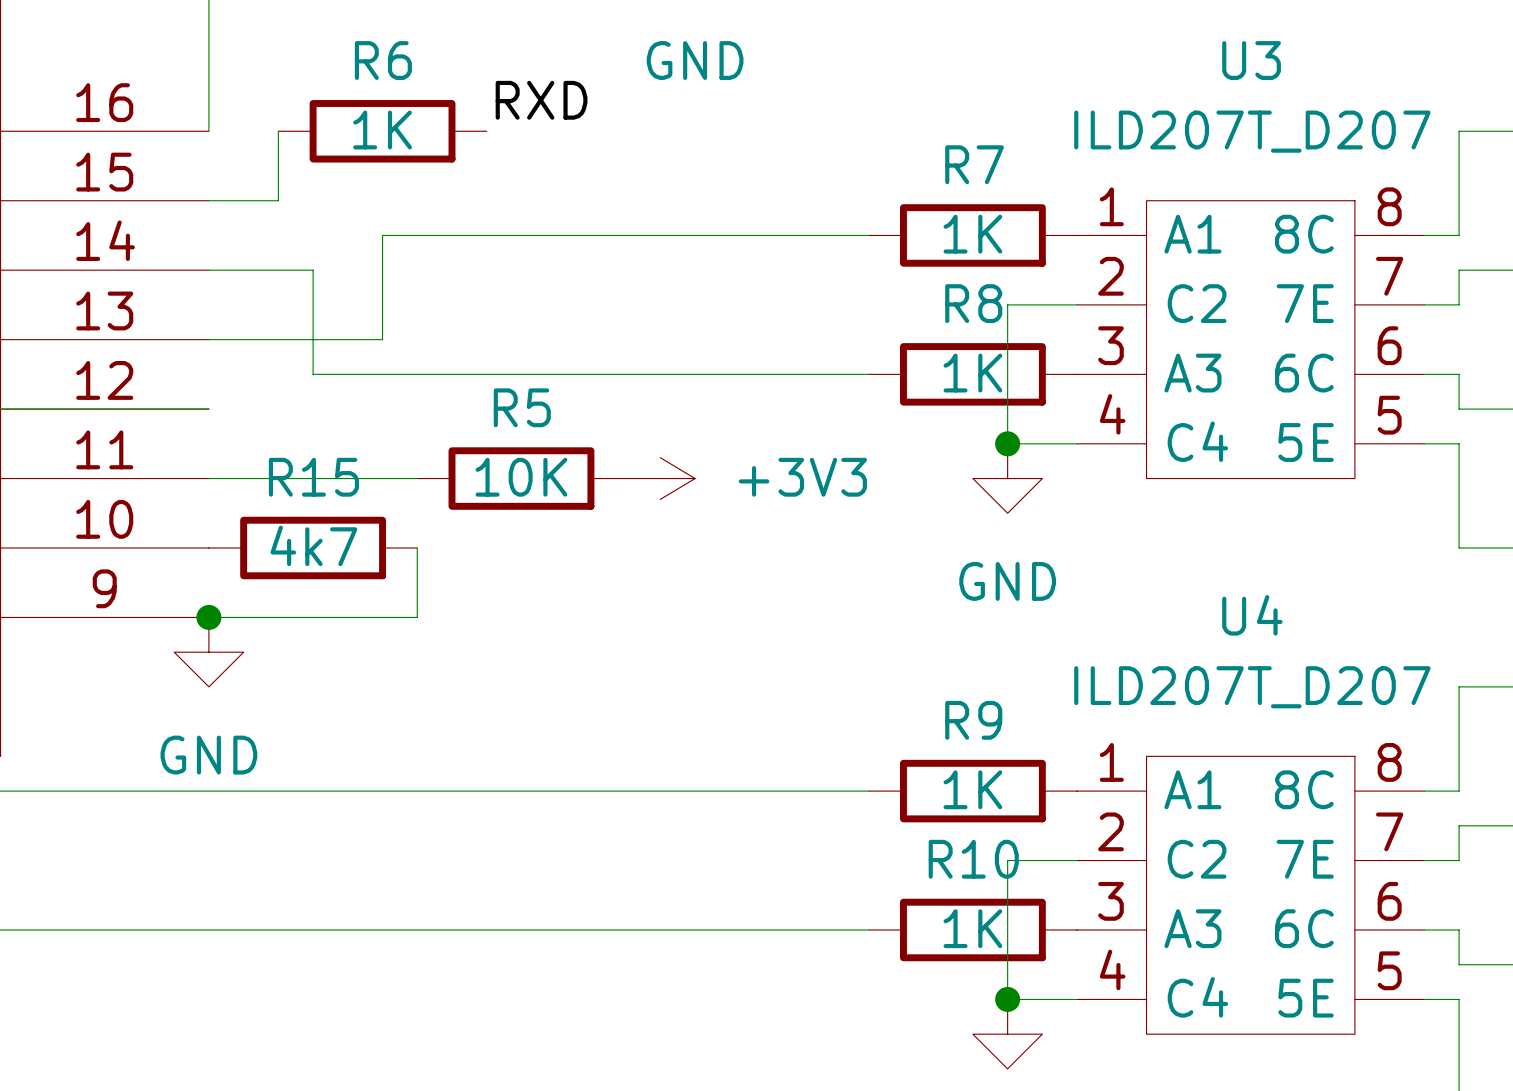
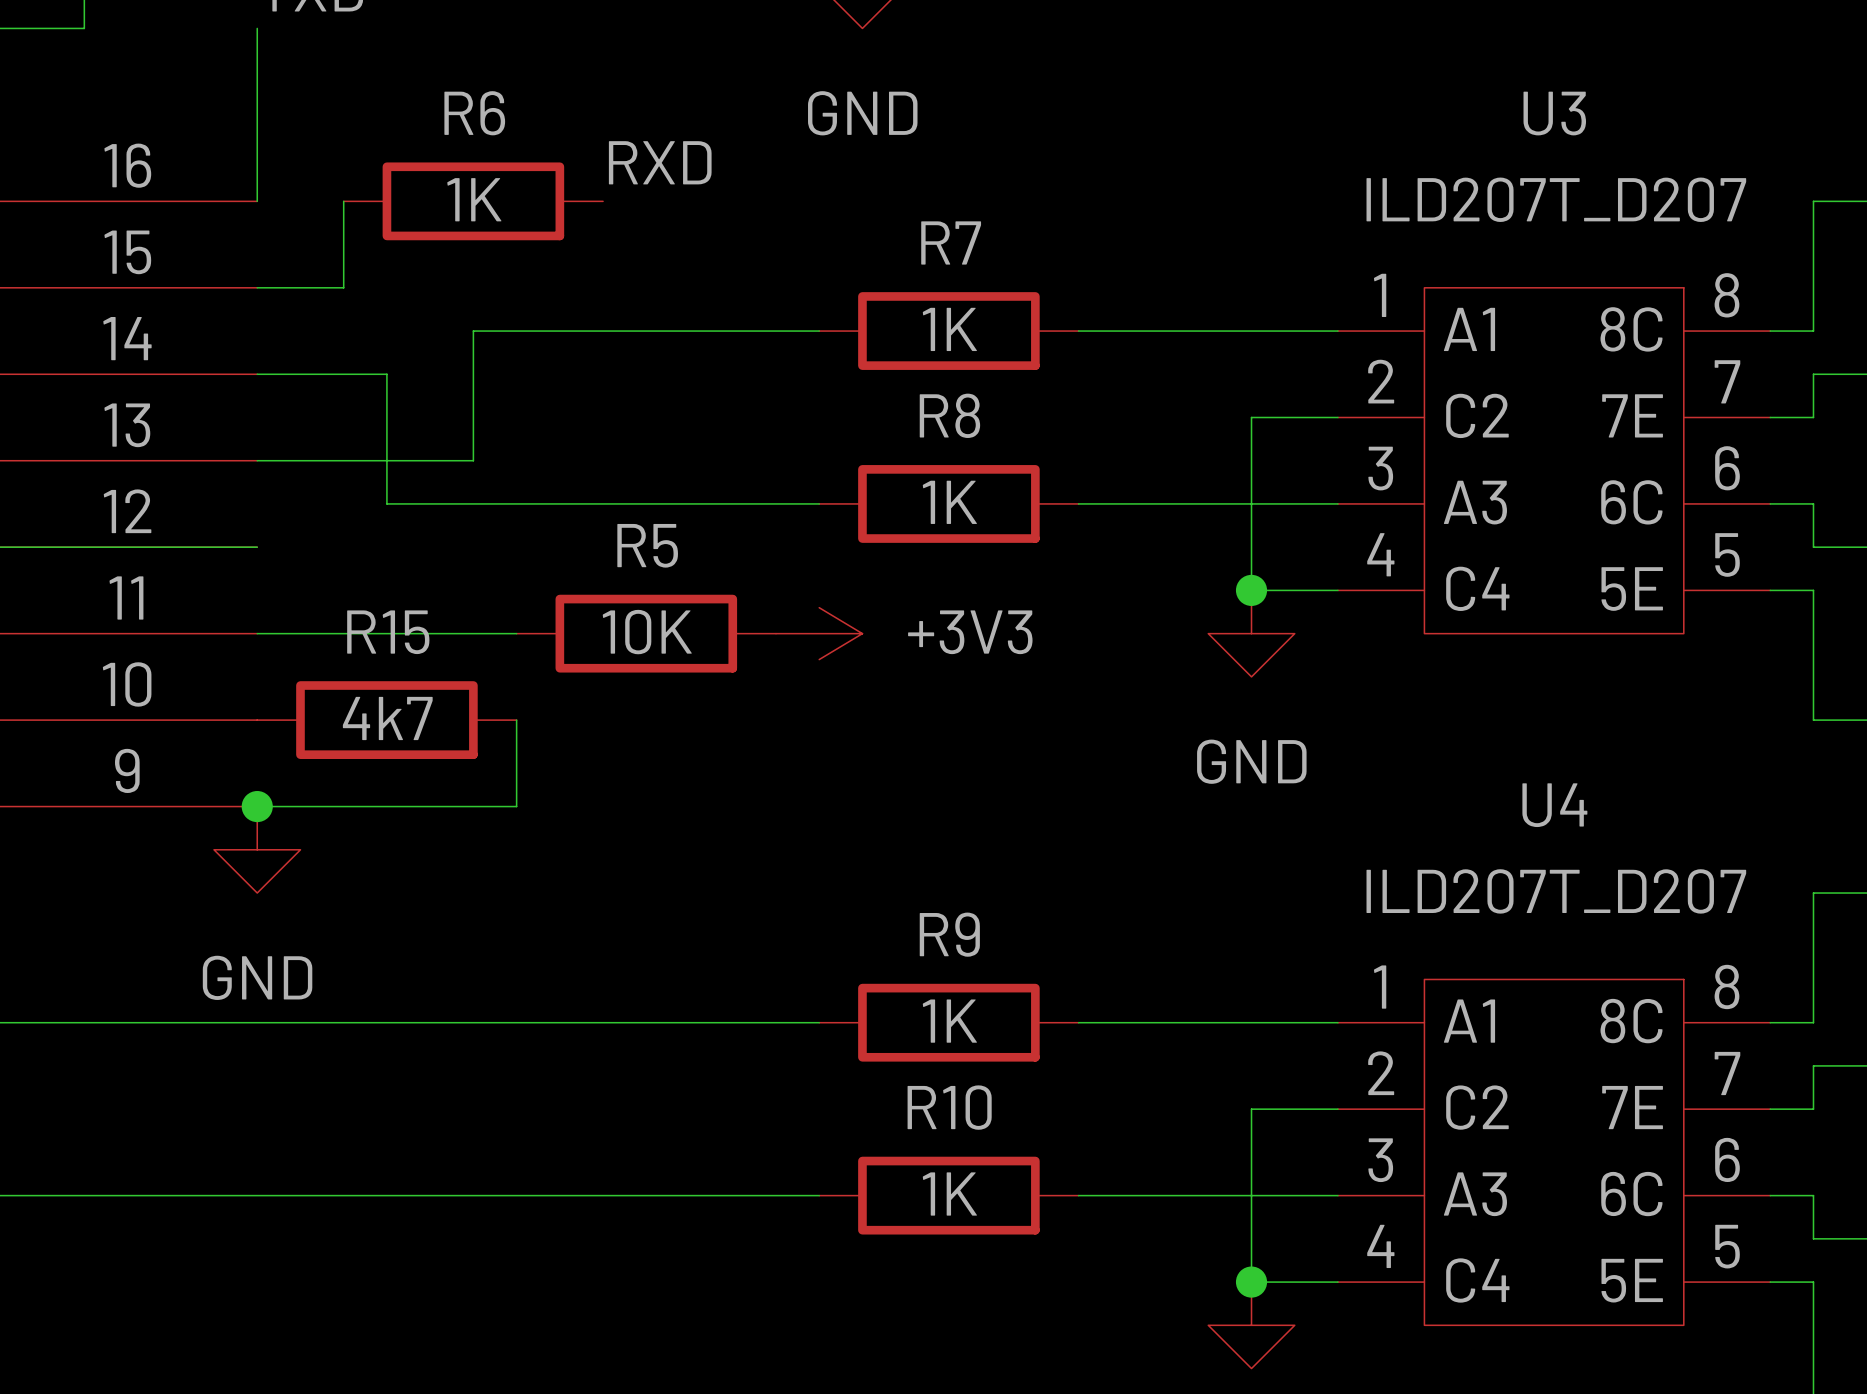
wire: (660, 235) (868, 235) -> (1337, 331) (1078, 331)
R7 position: (972, 235) -> (948, 331)
wire: (660, 374) (868, 374) -> (1337, 503) (1078, 503)
R8 position: (972, 374) -> (948, 503)
wire: (660, 791) (868, 791) -> (1337, 1022) (1078, 1022)
R9 position: (972, 791) -> (948, 1022)
wire: (660, 929) (868, 929) -> (1337, 1195) (1078, 1195)
R10 position: (972, 929) -> (948, 1195)

